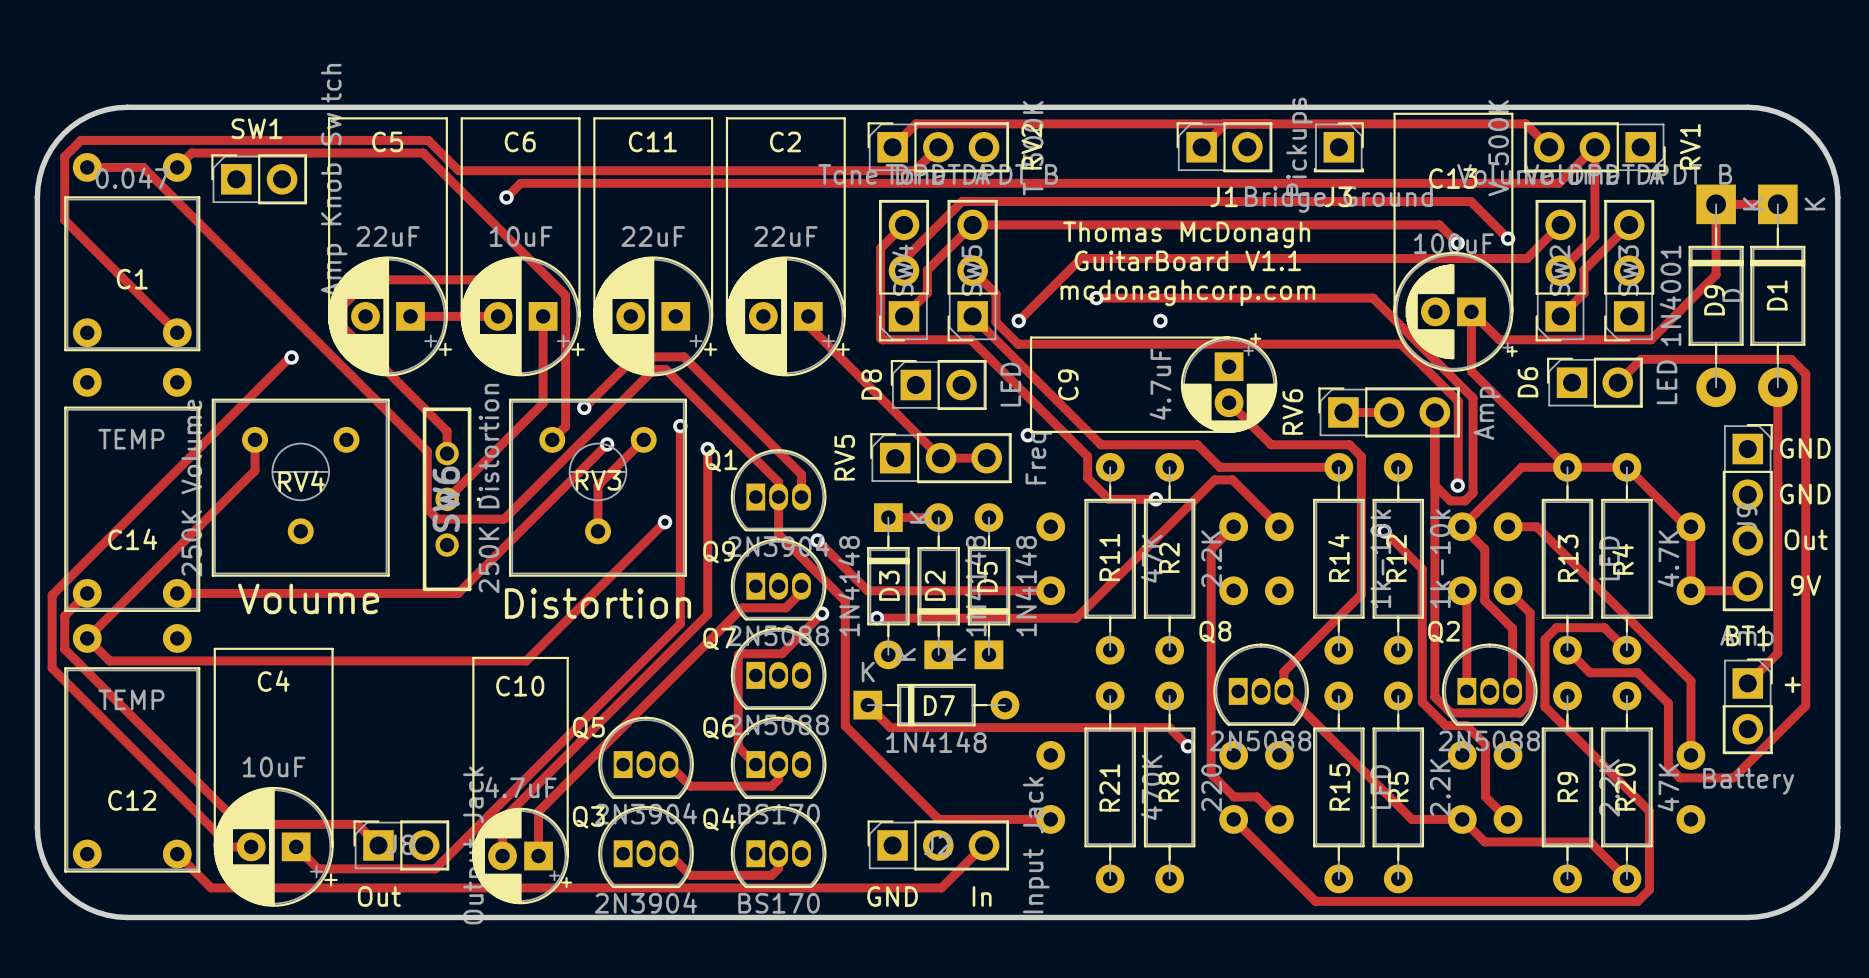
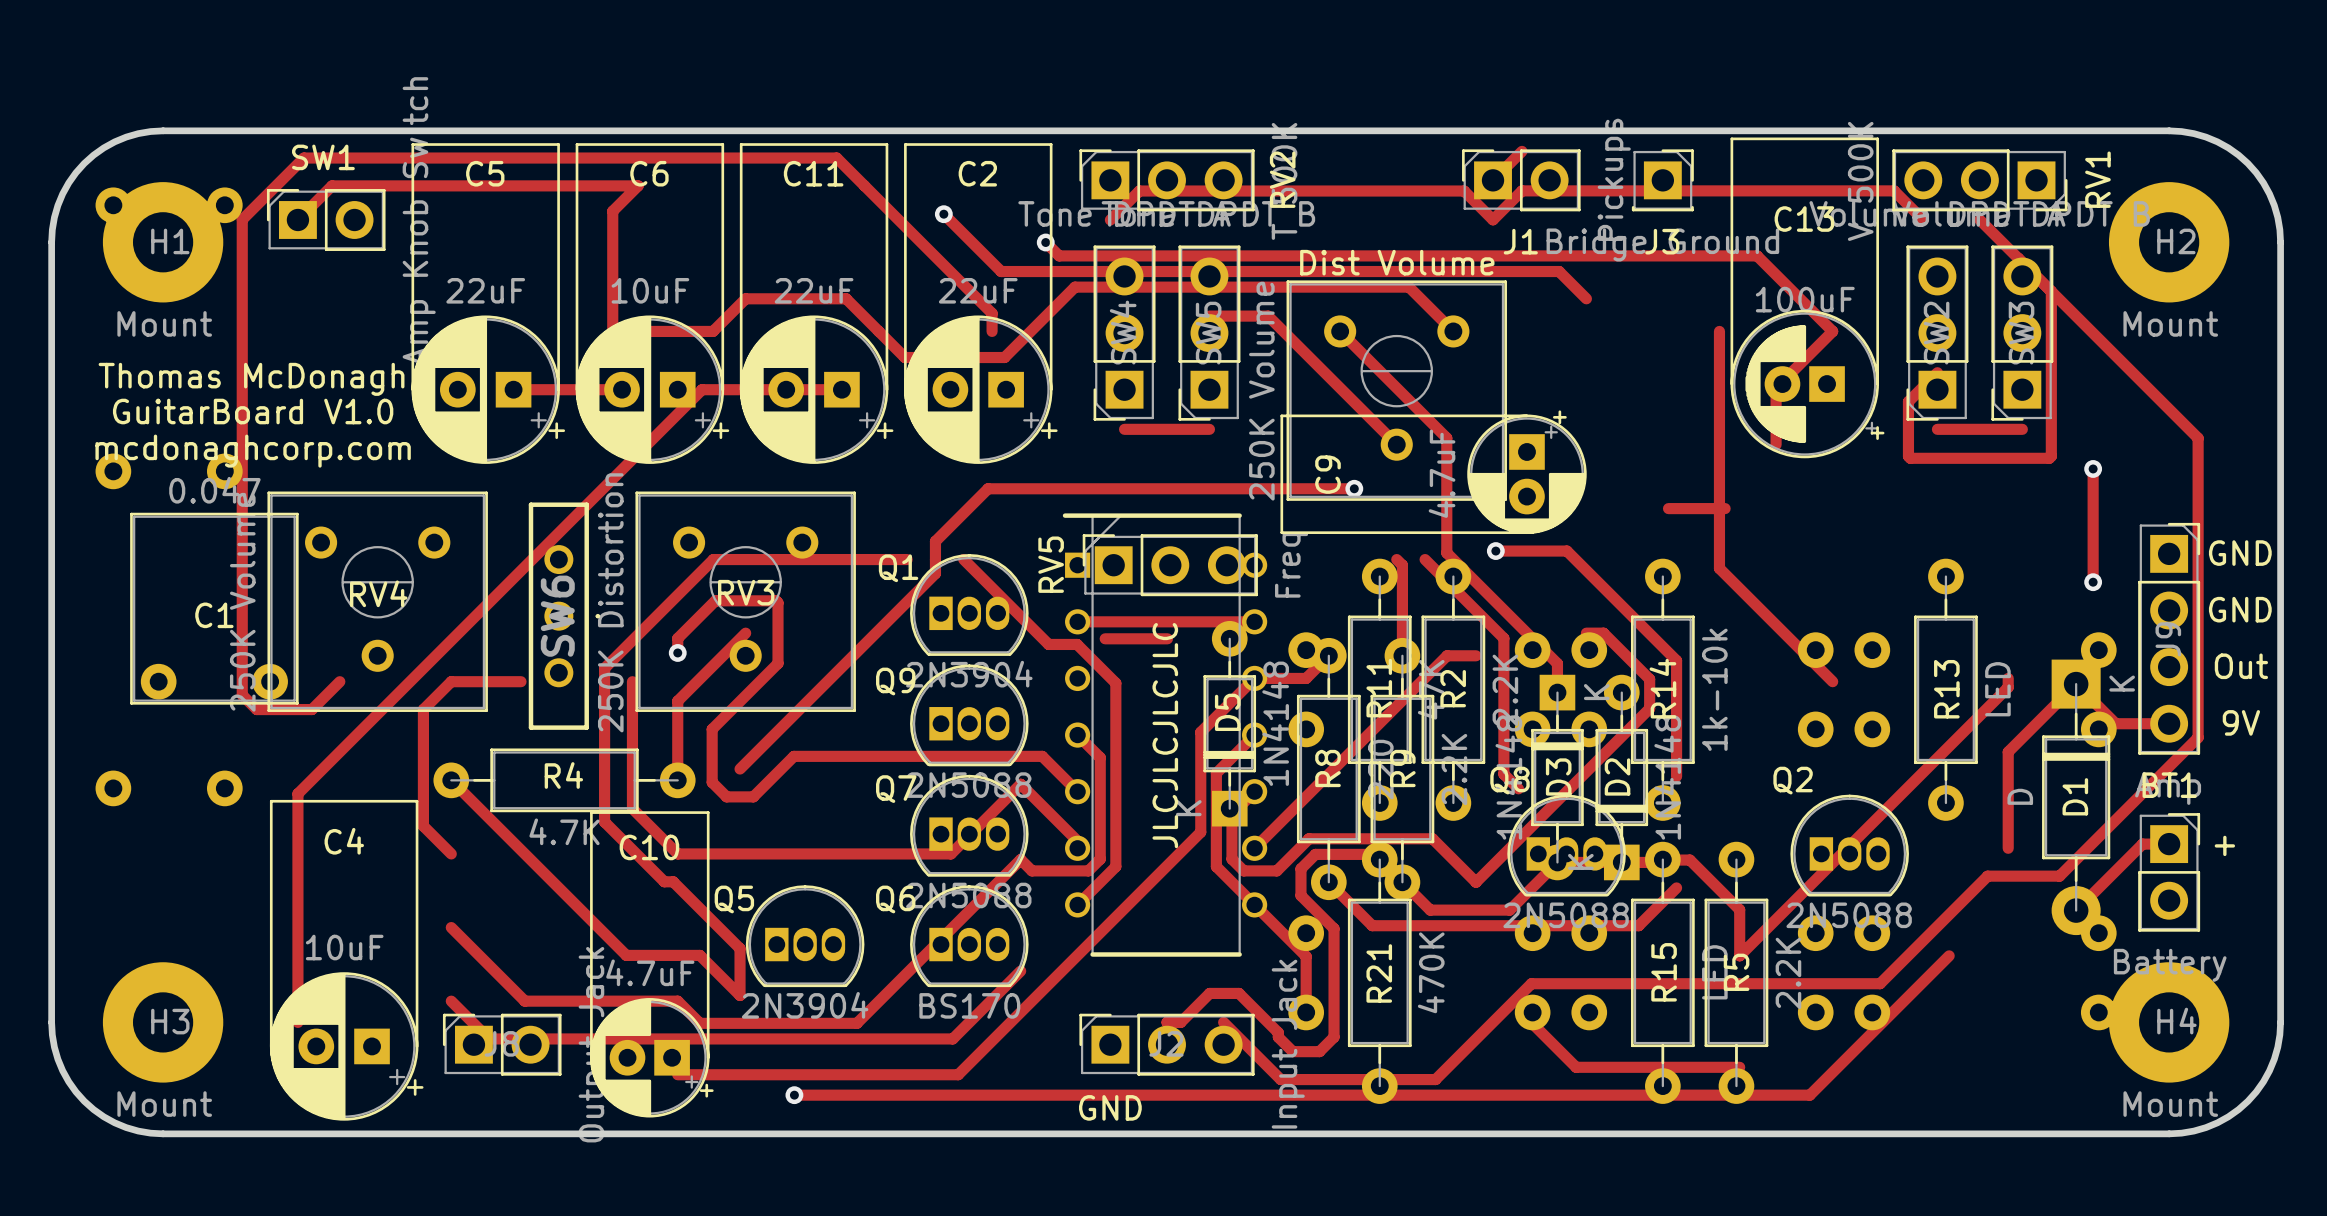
track: (892, 147) (915, 123) (1525, 123) (1549, 147) -> none
track: (938, 147) (914, 170) (458, 170) (428, 140) (80, 140) (64, 156) (64, 220) (177, 332) -> none
track: (87, 167) (143, 167) (427, 451) (427, 508) (437, 519) (504, 519) (653, 369) (665, 369) (778, 482) (778, 534) (845, 601) (845, 725) (938, 819) (1050, 819) -> none
track: (177, 167) (191, 153) (423, 153) (565, 295) (565, 426) (552, 439) -> none
track: none -> (943, 214) (1001, 271) (1559, 271) (1586, 298)
via: none -> (943, 214)
track: none -> (297, 219) (332, 185) (638, 185) (612, 211) (612, 331) (713, 331) (745, 298) (846, 298) (904, 357) (1004, 357) (1074, 287) (1409, 287) (1453, 331)
track: none -> (1110, 219) (1139, 191) (1464, 191) (1493, 219) (1521, 190) (1894, 190) (1923, 219)
track: none -> (1979, 219) (2198, 438) (2198, 737) (2059, 876) (1987, 876) (1880, 983) (1531, 983) (1435, 1079) (1280, 1079) (1223, 1022)
H1: none -> Mount (163, 242)
track: (506, 197) (520, 183) (1558, 183) (1594, 147) (1594, 236) (1560, 270) -> none
via: (506, 197) -> none
track: none -> (1045, 242) (1059, 255) (1757, 255) (1832, 331) (1776, 388) (1776, 444)
via: none -> (1045, 242)
H2: none -> Mount (2169, 242)
track: (1777, 204) (1716, 204) (1716, 274) (1651, 339) (1499, 339) (1471, 311) (1471, 371) (1567, 467) -> none
track: (904, 224) (880, 248) (880, 338) (882, 339) (970, 339) (1087, 456) (1087, 478) (1108, 499) (1155, 499) -> none
track: (1560, 224) (1527, 258) (1081, 258) (1018, 320) -> none
track: (1629, 224) (1584, 270) (1584, 292) (1560, 316) -> none
text: Thomas McDonagh (1186, 234) -> none
track: none -> (2051, 291) (2051, 456) (2049, 458) (1910, 458) (1908, 456) (1908, 401) (1937, 372)
track: (1508, 238) (1470, 201) (962, 201) (904, 259) (904, 270) -> none
via: (1508, 238) -> none
track: (1457, 243) (1439, 224) (972, 224) (927, 270) (927, 292) (904, 316) -> none
via: (1457, 243) -> none
track: none -> (1209, 316) (1268, 316) (1396, 444)
text: GuitarBoard V1.1 (1187, 260) -> none
track: none -> (992, 331) (992, 313) (836, 158) (303, 158) (242, 219) (242, 695) (256, 709) (311, 709) (339, 681)
track: none -> (1340, 331) (1446, 438) (1446, 552) (1557, 663) (1557, 692) (1554, 689)
track: none -> (1719, 331) (1719, 568) (1832, 681)
track: (972, 270) (996, 294) (996, 321) (1018, 344) (1401, 344) (1458, 401) (1457, 485) -> none
C1 position: (132, 273) -> (214, 608)
track: (511, 279) (368, 279) (342, 305) (342, 327) (447, 431) (447, 453) -> none
text: mcdonaghcorp.com (1187, 292) -> none
D9: 1N4001 (1716, 295) -> none
D1 position: (1777, 295) -> (2076, 797)
track: (1096, 298) (1373, 298) (1473, 398) (1473, 492) (1465, 500) (1450, 500) (1434, 485) -> none
via: (1096, 298) -> none
text: none -> Thomas McDonagh (251, 379)
track: (543, 316) (543, 403) (447, 499) -> none
track: none -> (839, 389) (702, 389) (297, 793) (297, 1022)
track: (808, 316) (808, 325) (940, 458) (986, 458) -> none
track: (972, 316) (1101, 444) (1197, 444) (1219, 467) (1338, 467) -> none
Dist Volume: none -> 250K Volume (1396, 390)
via: (1018, 320) -> none
via: (1160, 320) -> none
text: none -> GuitarBoard V1.0 (253, 411)
track: none -> (1124, 429) (1209, 429)
track: none -> (1937, 429) (2022, 429)
track: (291, 357) (52, 595) (52, 668) (230, 846) (251, 846) -> none
via: (291, 357) -> none
text: none -> mcdonaghcorp.com (253, 451)
track: none -> (2093, 468) (2093, 582)
via: none -> (2093, 468)
D6: LED (1594, 382) -> none
track: (1617, 382) (1641, 359) (1791, 359) (1805, 373) (1805, 705) (1733, 777) (1680, 777) (1668, 766) (1668, 703) (1637, 672) (1589, 672) (1567, 650) -> none
D8: LED (938, 384) -> none
track: (1777, 387) (1777, 653) (1747, 683) -> (2076, 910) (2142, 844) (2169, 844)
track: none -> (1354, 488) (988, 488) (935, 541) (935, 573) (740, 769)
via: none -> (1354, 488)
track: (1229, 402) (1271, 444) (1349, 444) (1361, 456) (1361, 594) (1283, 671) (1283, 691) (1412, 819) (1462, 819) (1484, 841) (1589, 841) (1626, 878) -> none
track: (584, 407) (635, 356) (683, 356) (801, 474) (801, 497) -> none
via: (584, 407) -> none
RV6: Amp (1389, 412) -> none
track: (1434, 412) (1434, 696) (1450, 712) (1519, 712) (1530, 702) (1530, 612) (1508, 590) -> none
track: (680, 426) (680, 624) (435, 868) (318, 868) (296, 846) -> none
via: (680, 426) -> none
via: (1027, 435) -> none
track: (255, 439) (255, 470) (87, 638) (109, 660) (526, 660) (665, 522) -> none
track: (643, 439) (598, 485) (598, 531) -> none
track: (607, 444) (458, 593) (177, 593) -> none
via: (607, 444) -> none
track: none -> (1495, 551) (1566, 551) (1676, 660) (1676, 776)
via: none -> (1495, 551)
track: (707, 449) (707, 614) (502, 819) (502, 856) -> none
via: (707, 449) -> none
track: none -> (907, 559) (713, 559) (604, 668) (604, 822) (664, 881) (673, 881) (740, 948) (740, 995) (699, 955) (626, 955) (451, 780)
track: none -> (963, 559) (1048, 644) (1077, 644) (1115, 683) (1115, 866) (1077, 904)
track: none -> (1396, 559) (1402, 565) (1402, 655)
track: none -> (1425, 559) (1503, 638) (1503, 774) (1518, 788)
via: none -> (2093, 582)
via: (1457, 485) -> none
via: (1155, 499) -> none
track: none -> (1077, 621) (1254, 621)
C14: TEMP (132, 509) -> none
track: none -> (745, 633) (677, 701) (677, 780)
track: none -> (1586, 633) (1603, 633) (1649, 679) (1649, 708) (1476, 882) (1432, 838) (1308, 838) (1276, 870) (1243, 870) (1231, 859) (1231, 814) (1254, 791)
via: (665, 522) -> none
track: (1233, 526) (1211, 549) (1211, 774) (1234, 796) (1256, 796) (1279, 819) -> none
track: (1279, 526) (1232, 479) (1214, 479) (1076, 618) (876, 618) -> none
track: (1508, 526) (1536, 526) (1690, 680) (1690, 755) -> none
track: none -> (677, 652) (677, 638) (715, 600) (776, 600) (778, 602) (778, 663) (712, 729) (712, 782) (726, 796) (753, 796) (793, 756) (1042, 756) (1077, 791)
via: none -> (677, 652)
track: none -> (1328, 655) (1306, 678) (1254, 678) (1200, 732) (1200, 832) (958, 1074) (677, 1074)
track: none -> (1476, 655) (1447, 655) (1254, 848)
track: (1384, 531) (1422, 569) (1422, 702) (1445, 725) (1466, 725) (1485, 744) (1485, 796) (1508, 819) -> none
via: (1384, 531) -> none
track: (817, 540) (867, 590) (1050, 590) -> none
via: (817, 540) -> none
track: none -> (2008, 678) (2008, 687) (1739, 955) (1739, 909) (1689, 860) (1663, 860) (1660, 862) (1557, 862) (1509, 910) (1430, 910) (1374, 854) (1315, 854) (1300, 868) (1300, 895) (1334, 928) (1334, 1037) (1319, 1051) (1292, 1051) (1278, 1037) (1278, 1032) (1239, 993) (1209, 993) (1180, 1022) (1167, 1022)
track: none -> (521, 681) (451, 681) (423, 709) (423, 826) (451, 853)
track: none -> (632, 681) (632, 808) (677, 853) (950, 853) (1020, 784) (1077, 841) (1077, 848)
R12: 1k-10k (1398, 558) -> none
R4 rotation: 0° (1626, 558) -> 90° clockwise (564, 780)
R4 position: (1626, 558) -> (564, 780)
track: (801, 586) (801, 592) (785, 607) (742, 607) (538, 811) (538, 856) -> none
D3 position: (888, 586) -> (1557, 777)
D2 position: (938, 586) -> (1621, 777)
track: (1747, 586) (1743, 590) (1690, 590) (1690, 526) (1686, 526) (1626, 467) (1521, 467) (1462, 526) (1484, 549) (1484, 600) (1512, 628) (1512, 691) -> (2169, 723) (2115, 723) (2076, 684) (2008, 752) (2008, 848)
track: (1462, 590) (1466, 595) (1466, 691) -> none
track: (87, 593) (64, 615) (64, 649) (239, 824) (357, 824) (378, 845) -> none
track: none -> (1077, 735) (1100, 757) (1100, 859) (1088, 870) (1031, 870) (1020, 859) (856, 1023) (699, 1023) (677, 1001) (524, 1001) (451, 927)
JLCJLCJLCJLC: none -> (1165, 735)
track: none -> (1254, 735) (1216, 773) (1216, 866) (1306, 956) (1306, 1023)
text: Volume (308, 598) -> none
text: Distortion (598, 603) -> none
track: (822, 613) (781, 653) (739, 653) (738, 655) (738, 747) (755, 764) -> none
via: (822, 613) -> none
via: (876, 618) -> none
track: (1626, 650) (1604, 627) (1556, 627) (1544, 639) (1544, 706) (1649, 811) (1649, 889) (1637, 901) (1315, 901) (1233, 819) -> none
track: (867, 705) (890, 727) (1169, 727) (1187, 746) -> none
D7: 1N4148 (936, 705) -> none
track: none -> (1328, 882) (1372, 925) (1638, 925) (1676, 887)
via: (1187, 746) -> none
track: (668, 764) (690, 786) (771, 786) (778, 779) (778, 764) -> none
C12: TEMP (132, 769) -> none
track: none -> (1949, 955) (1809, 1095) (794, 1095)
track: none -> (1020, 971) (952, 1038) (489, 1038) (451, 1001)
R8 position: (1169, 787) -> (1328, 769)
R9 position: (1567, 787) -> (1402, 769)
R20: 47K (1626, 787) -> none
H3: none -> Mount (163, 1022)
H4: none -> Mount (2169, 1022)
track: none -> (1532, 1023) (1576, 1067) (1739, 1067)
track: (984, 845) (941, 887) (211, 887) (177, 854) -> none
Q3: 2N3904 (646, 846) -> none
Q4: BS170 (778, 846) -> none
track: (668, 853) (690, 875) (771, 875) (778, 868) (778, 853) -> none
via: none -> (794, 1095)
text: Out (379, 896) -> none
text: In (982, 896) -> none

